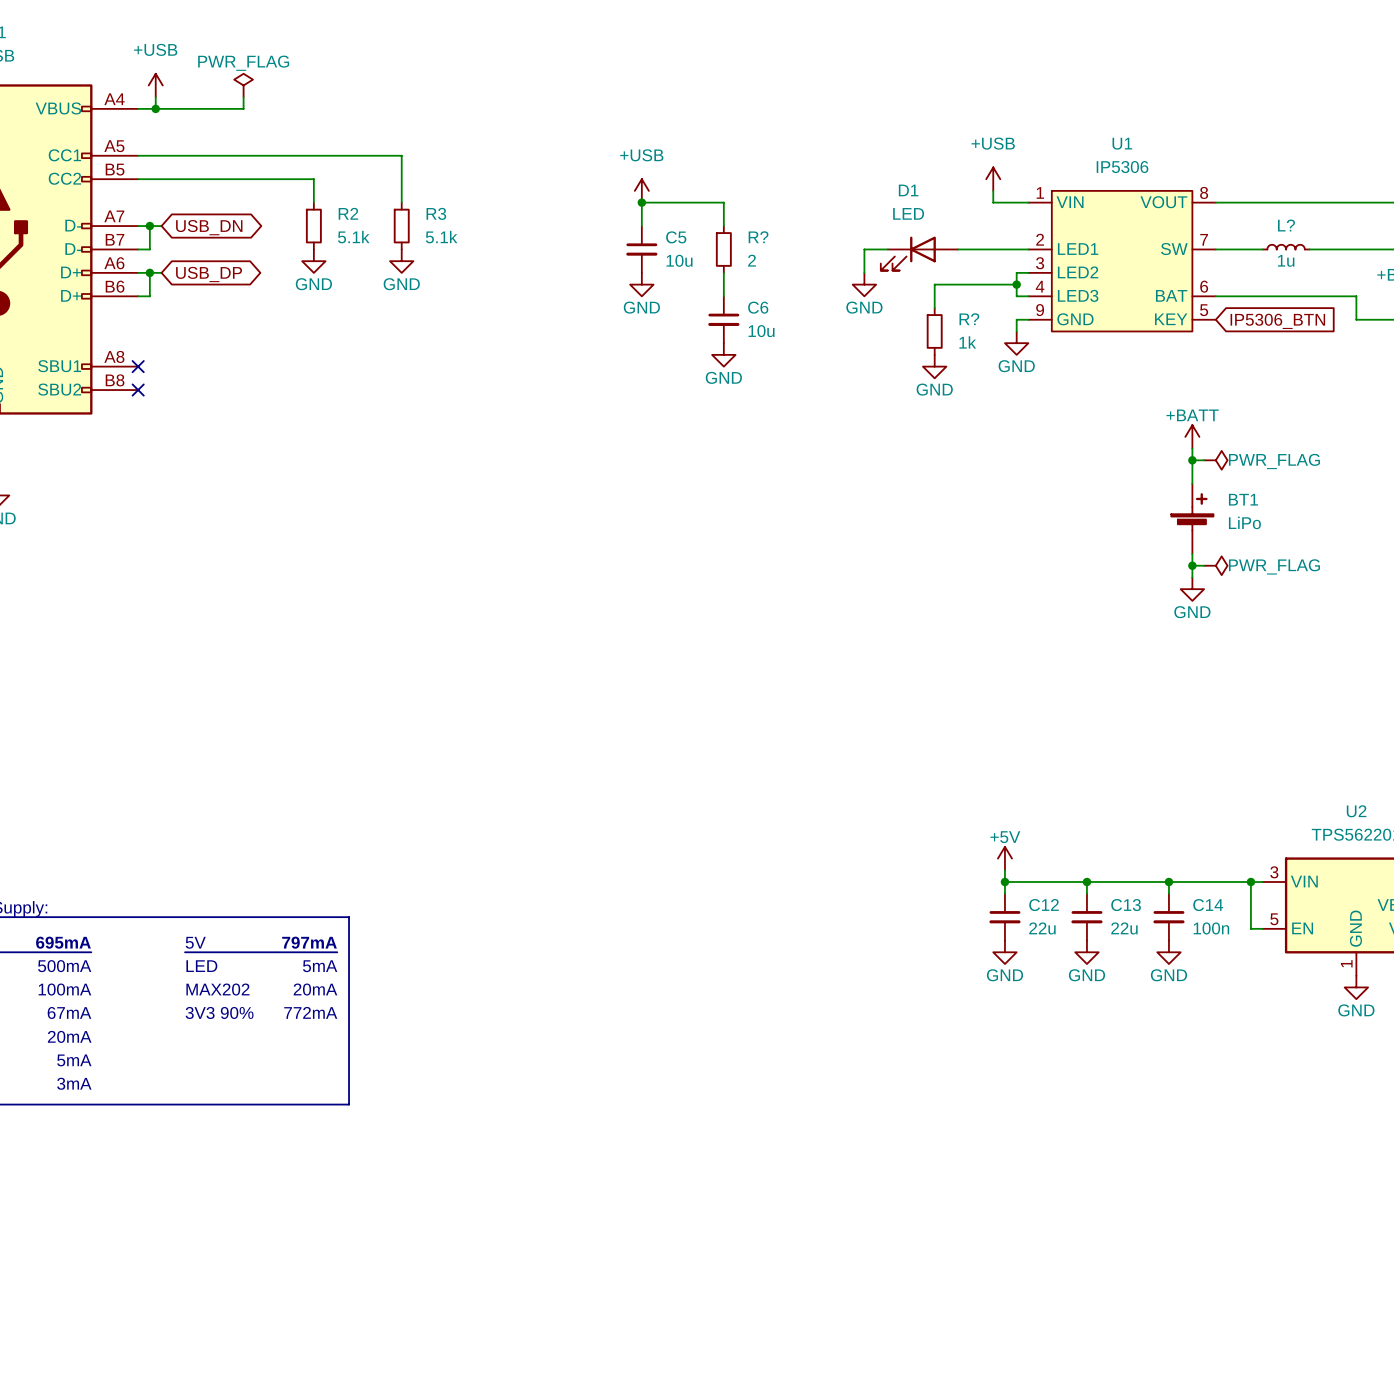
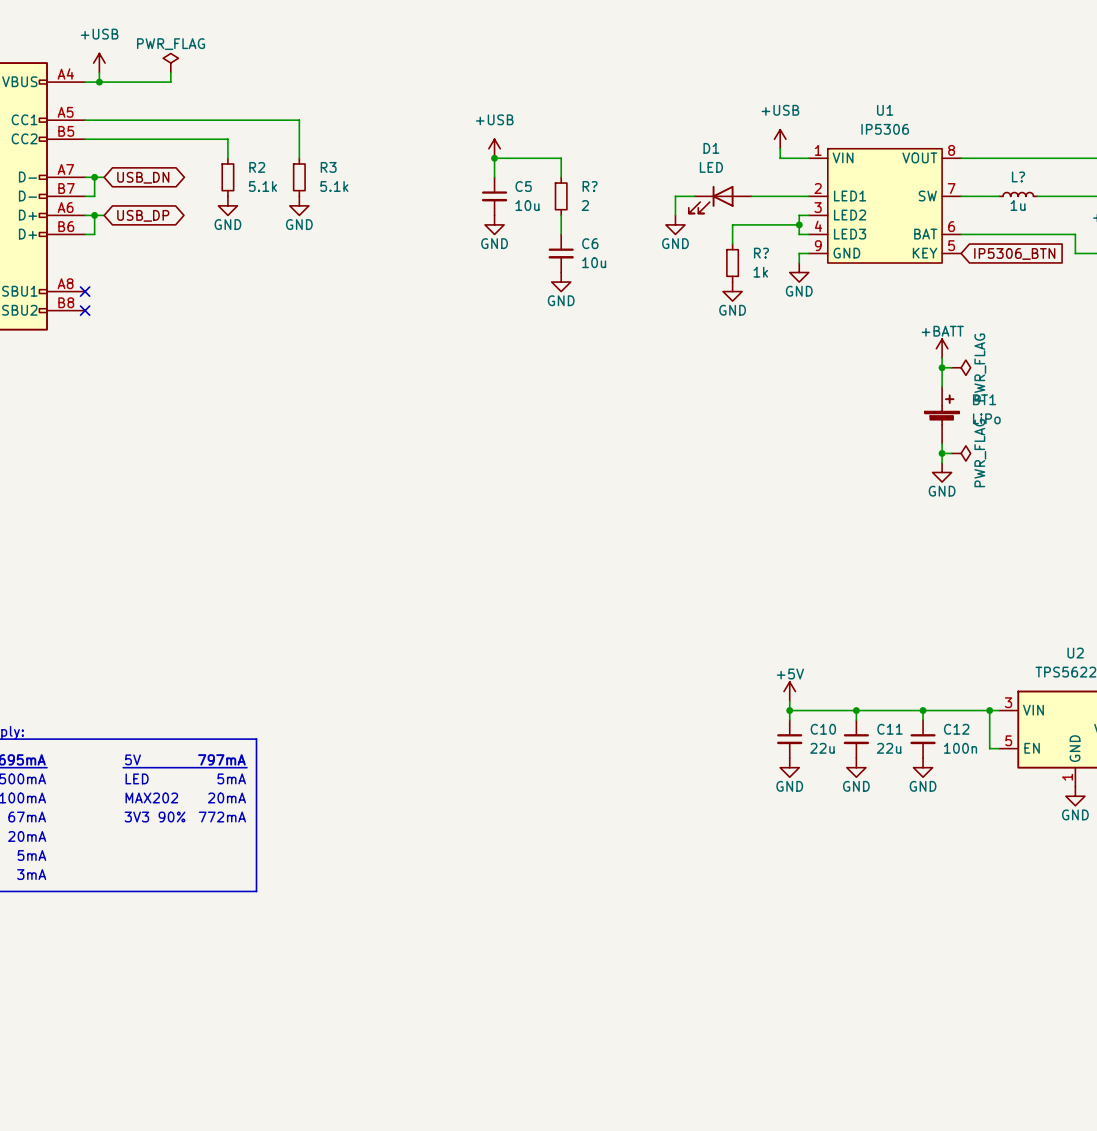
power symbol text rotation: 0° (1274, 461) -> 90° counterclockwise (980, 367)
power symbol text rotation: 0° (1274, 566) -> 90° counterclockwise (980, 453)
C12 name: C12 (1044, 905) -> C10 (823, 729)
C13 name: C13 (1126, 905) -> C11 (890, 729)
C14 name: C14 (1208, 905) -> C12 (956, 729)

